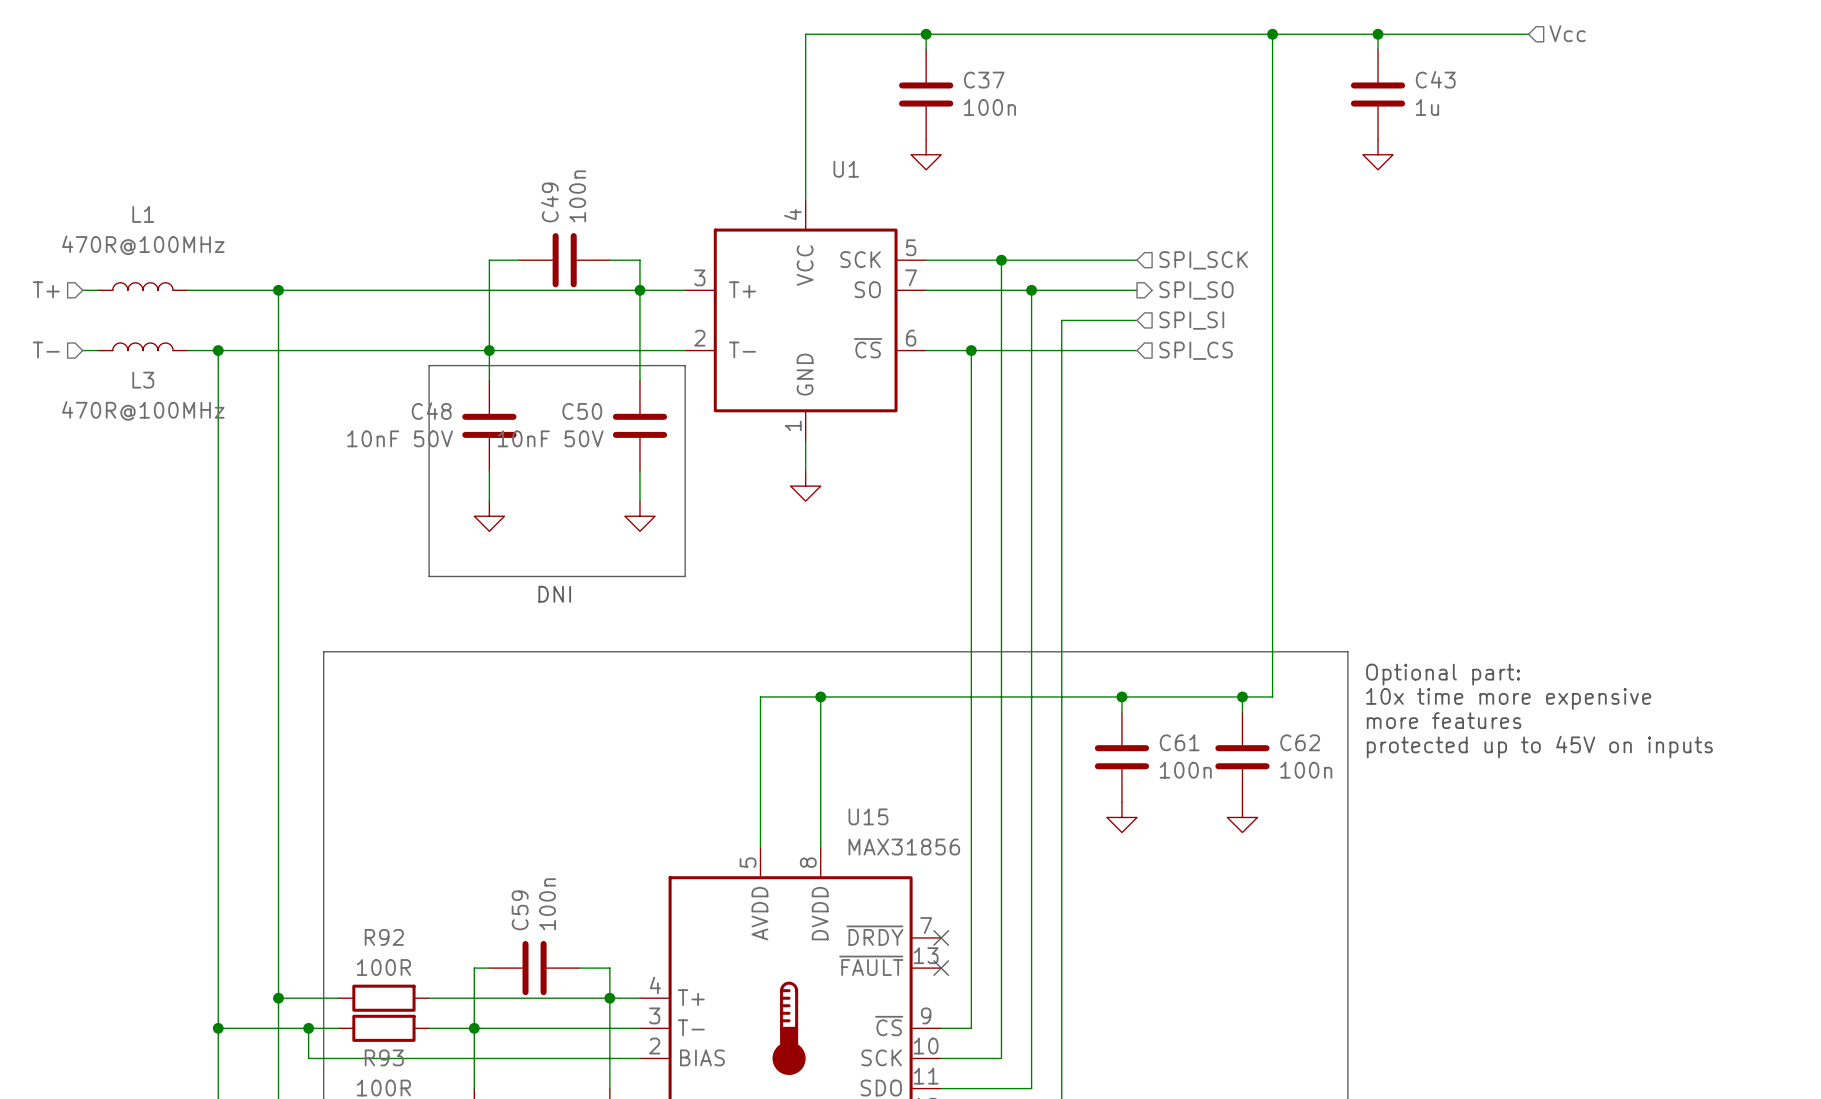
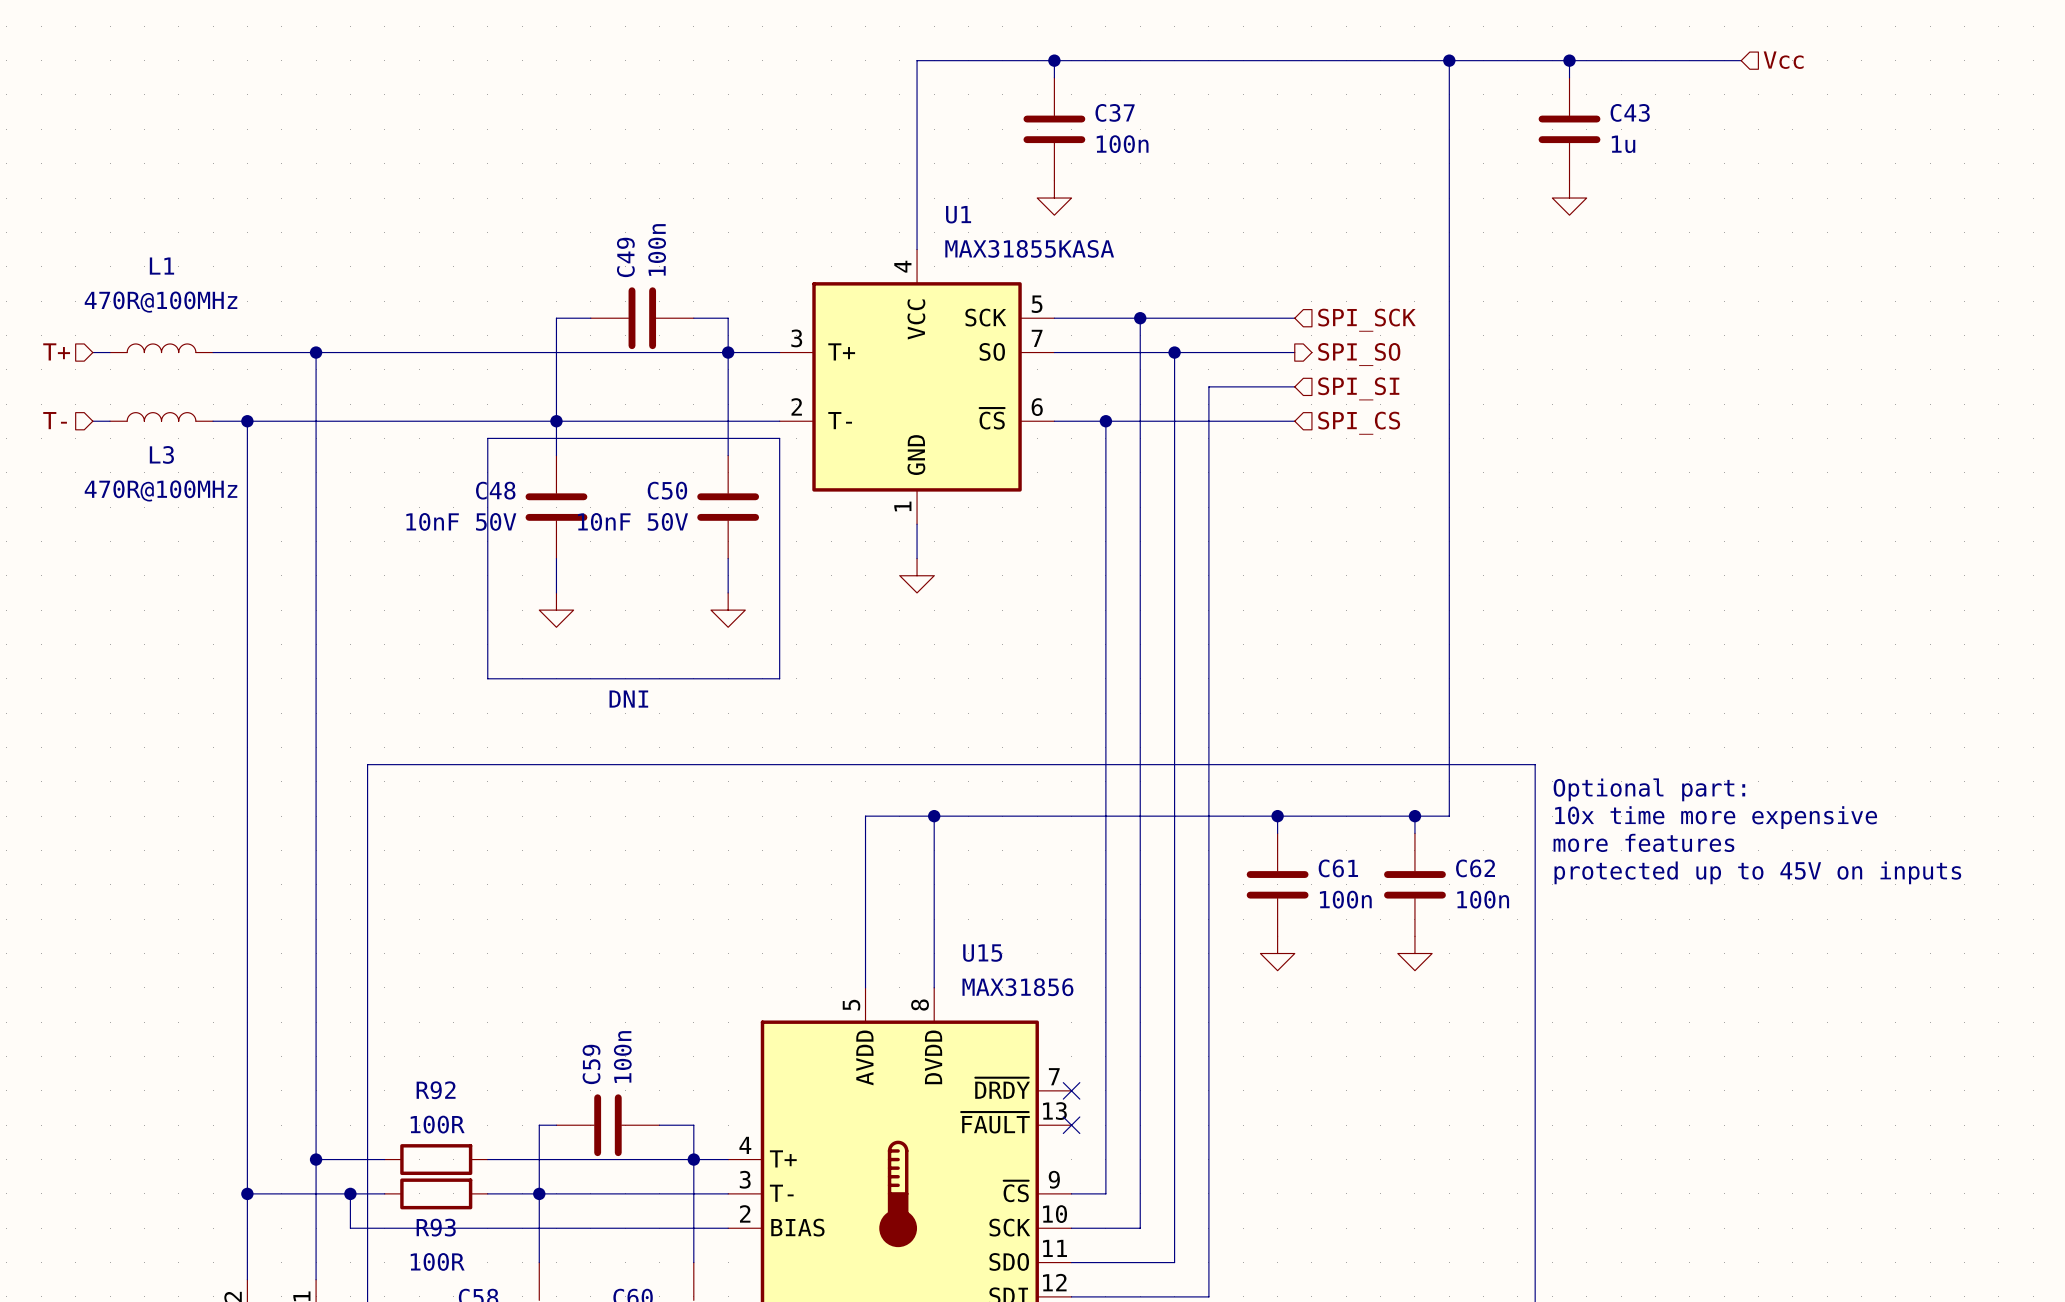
U1 value: none -> MAX31855KASA (1029, 248)

